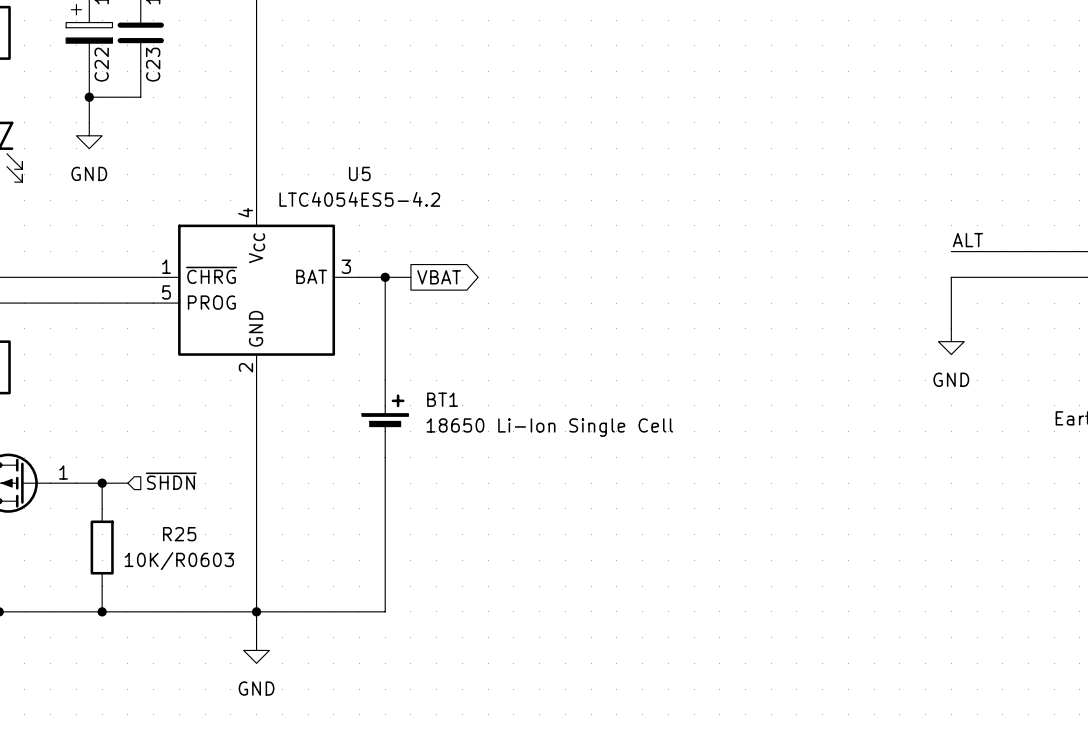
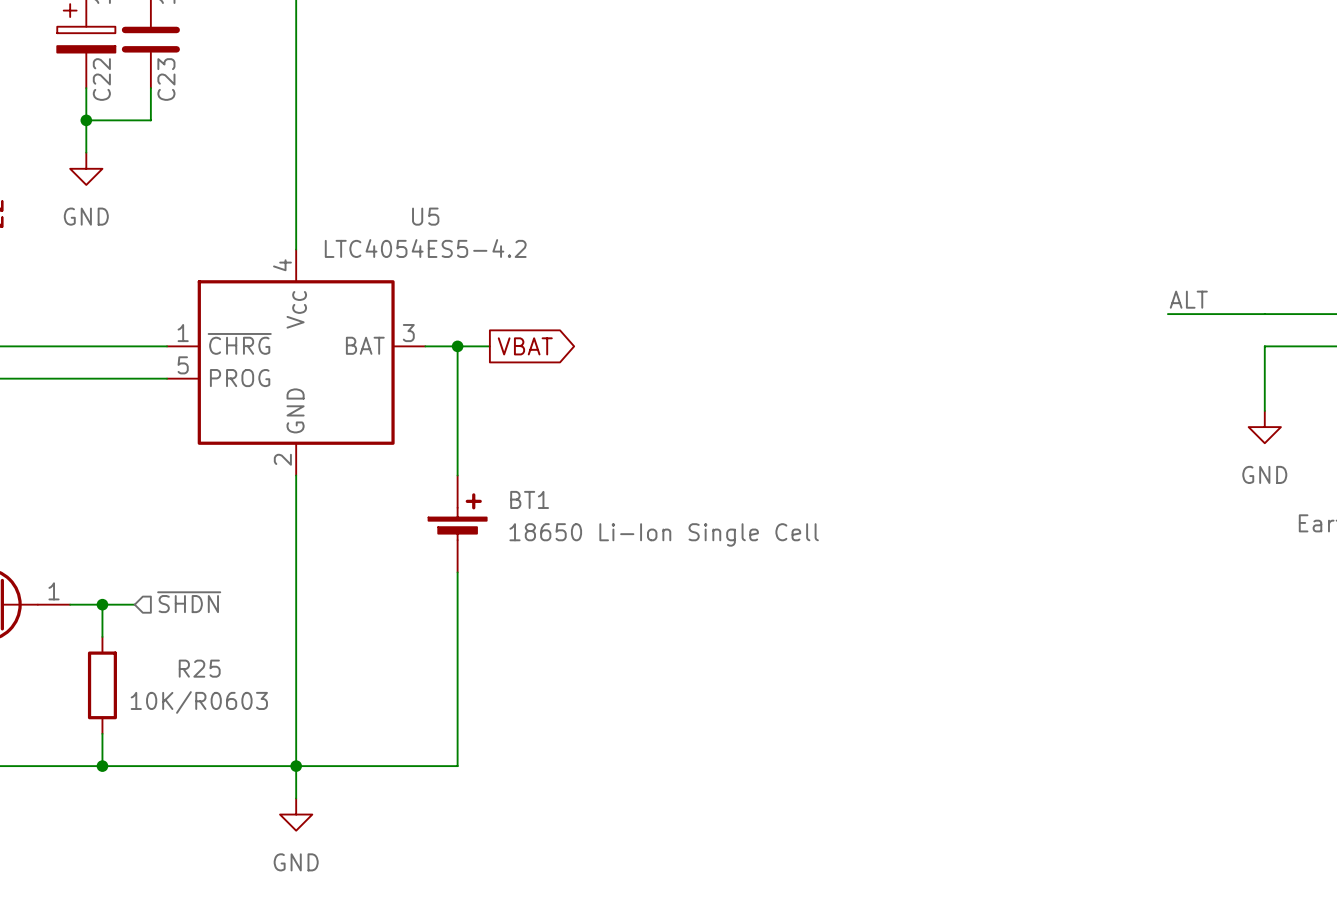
wire: (1028, 277) (951, 277) (951, 328) -> (1264, 346) (1264, 410)
power symbol position: GND (951, 341) -> GND (1264, 427)

